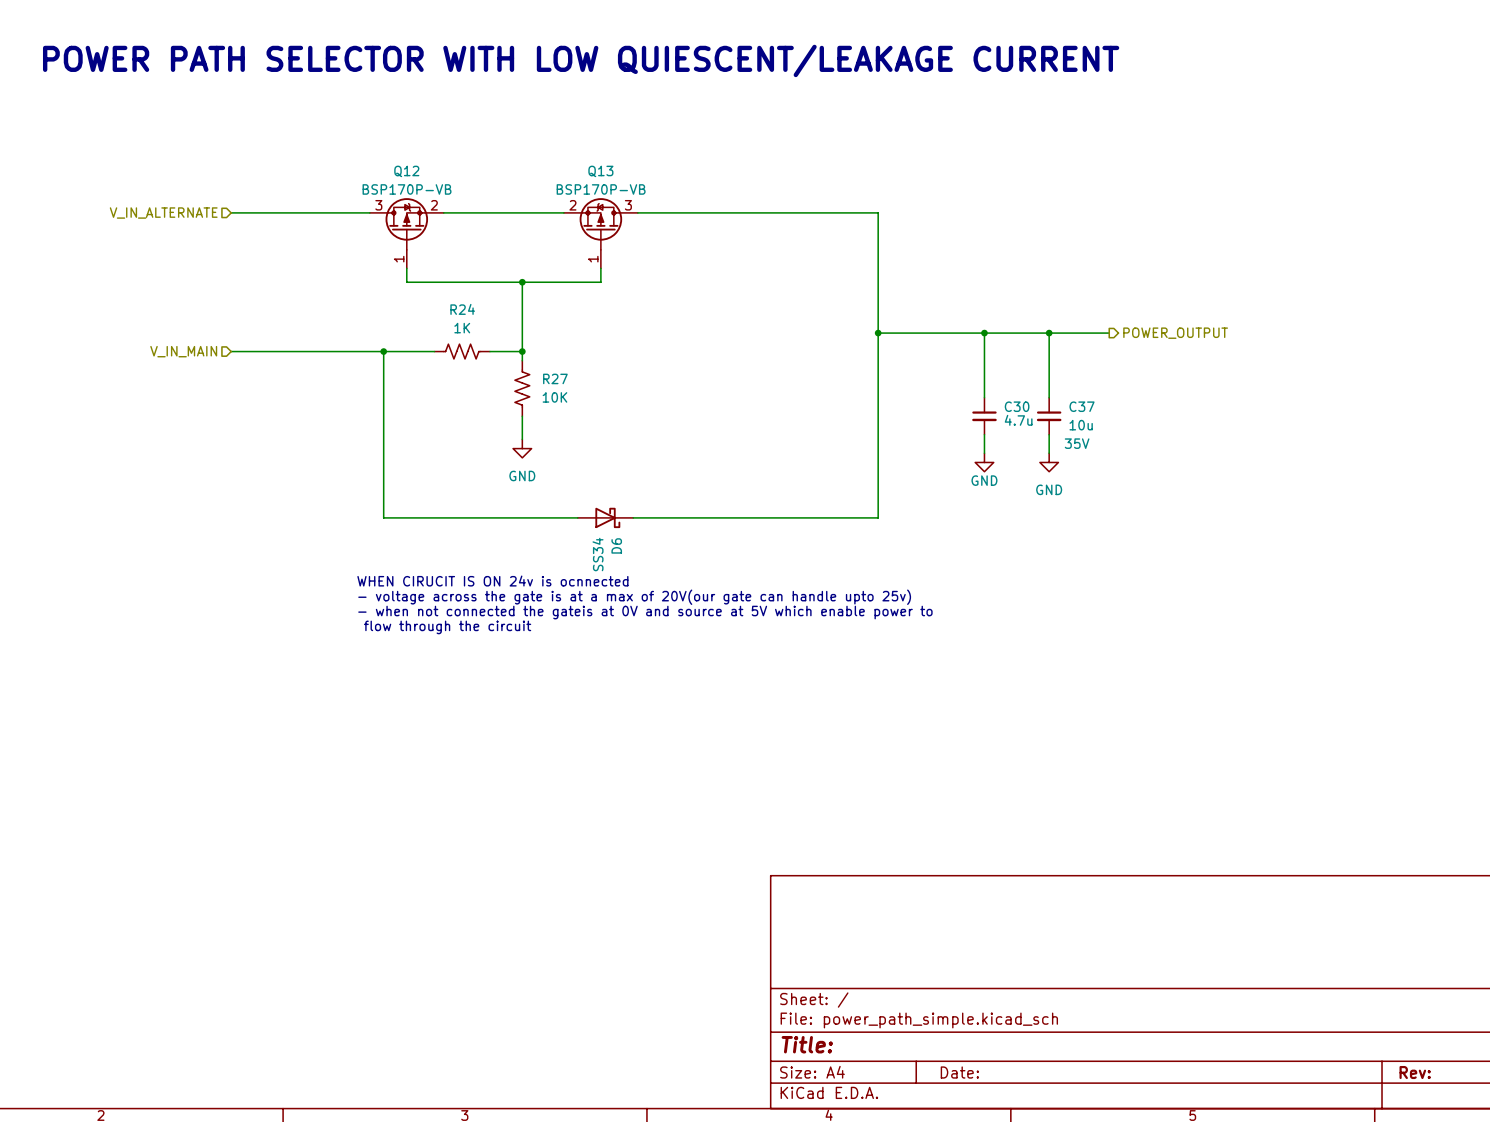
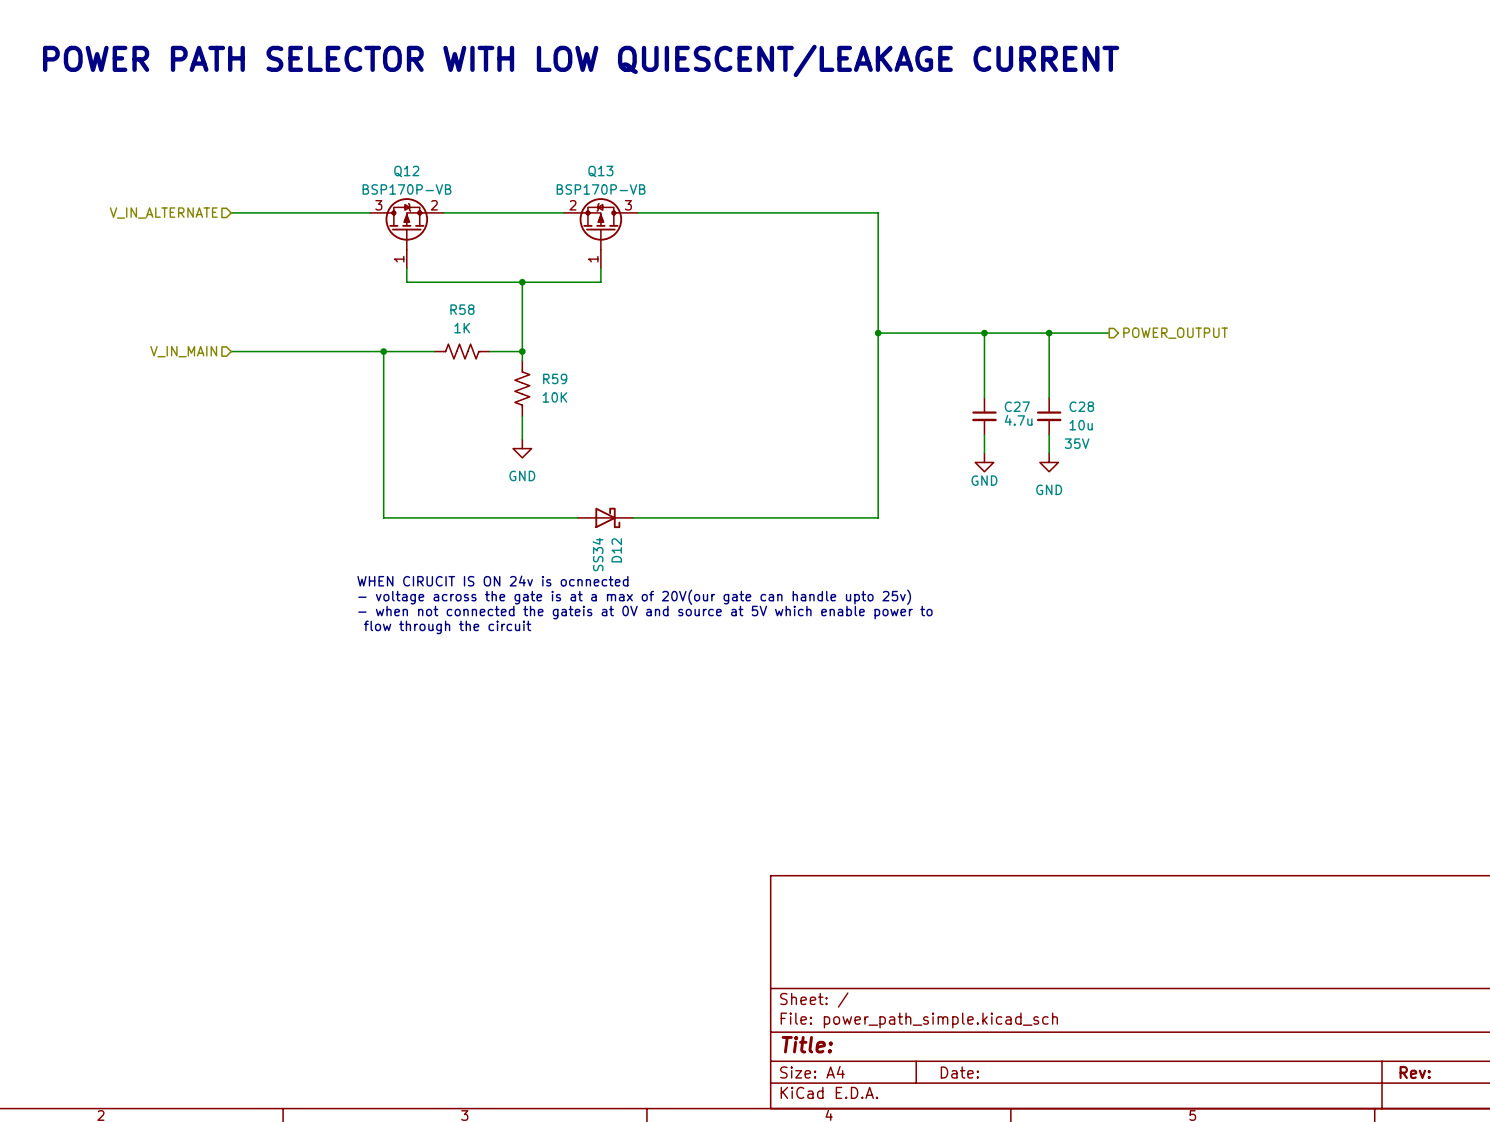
R24 name: R24 (462, 309) -> R58 (462, 309)
R27 name: R27 (555, 378) -> R59 (555, 378)
C30 name: C30 (1017, 406) -> C27 (1017, 406)
C37 name: C37 (1082, 406) -> C28 (1081, 406)
D6 name: D6 (616, 545) -> D12 (616, 550)

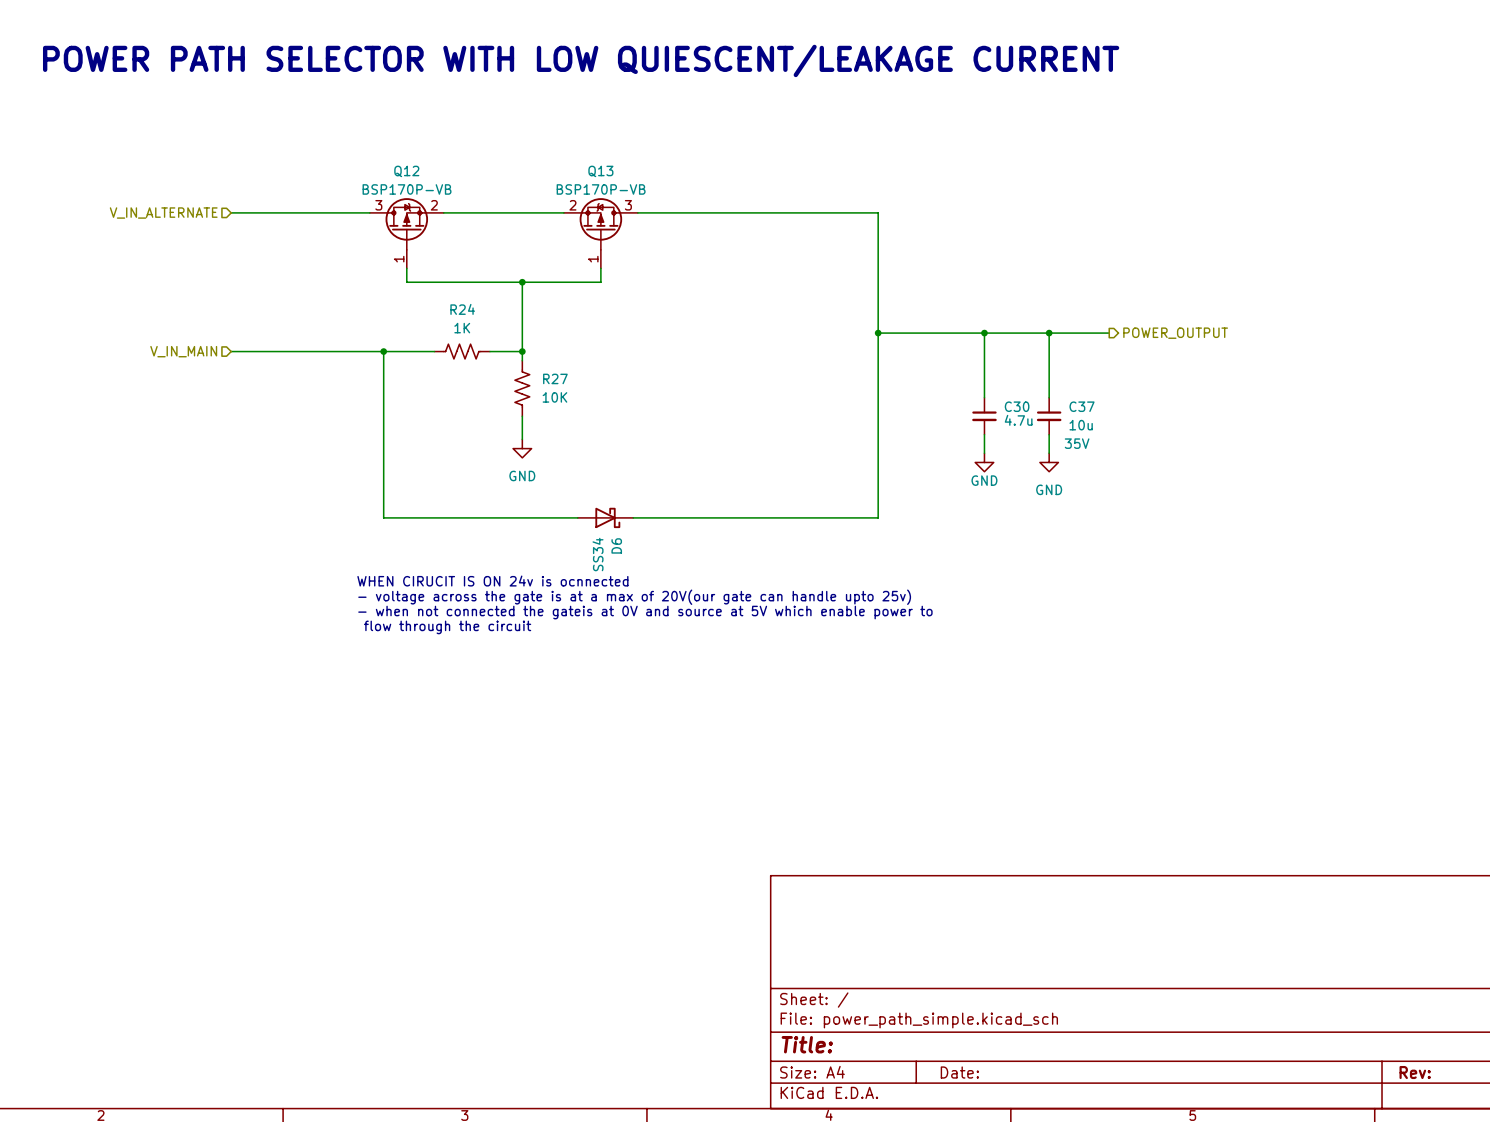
R58 name: R58 (462, 309) -> R24 (462, 309)
R59 name: R59 (555, 378) -> R27 (555, 378)
C27 name: C27 (1017, 406) -> C30 (1017, 406)
C28 name: C28 (1081, 406) -> C37 (1082, 406)
D12 name: D12 (616, 550) -> D6 (616, 545)

